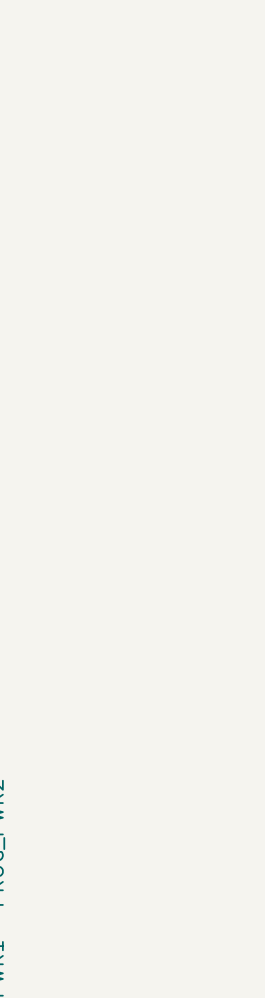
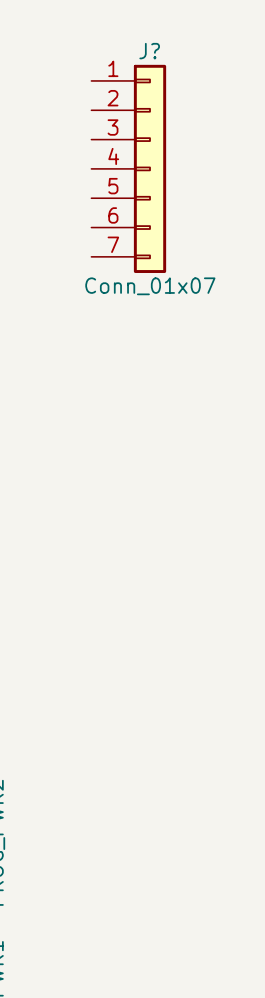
J?: none -> Conn_01x07 (128, 168)

